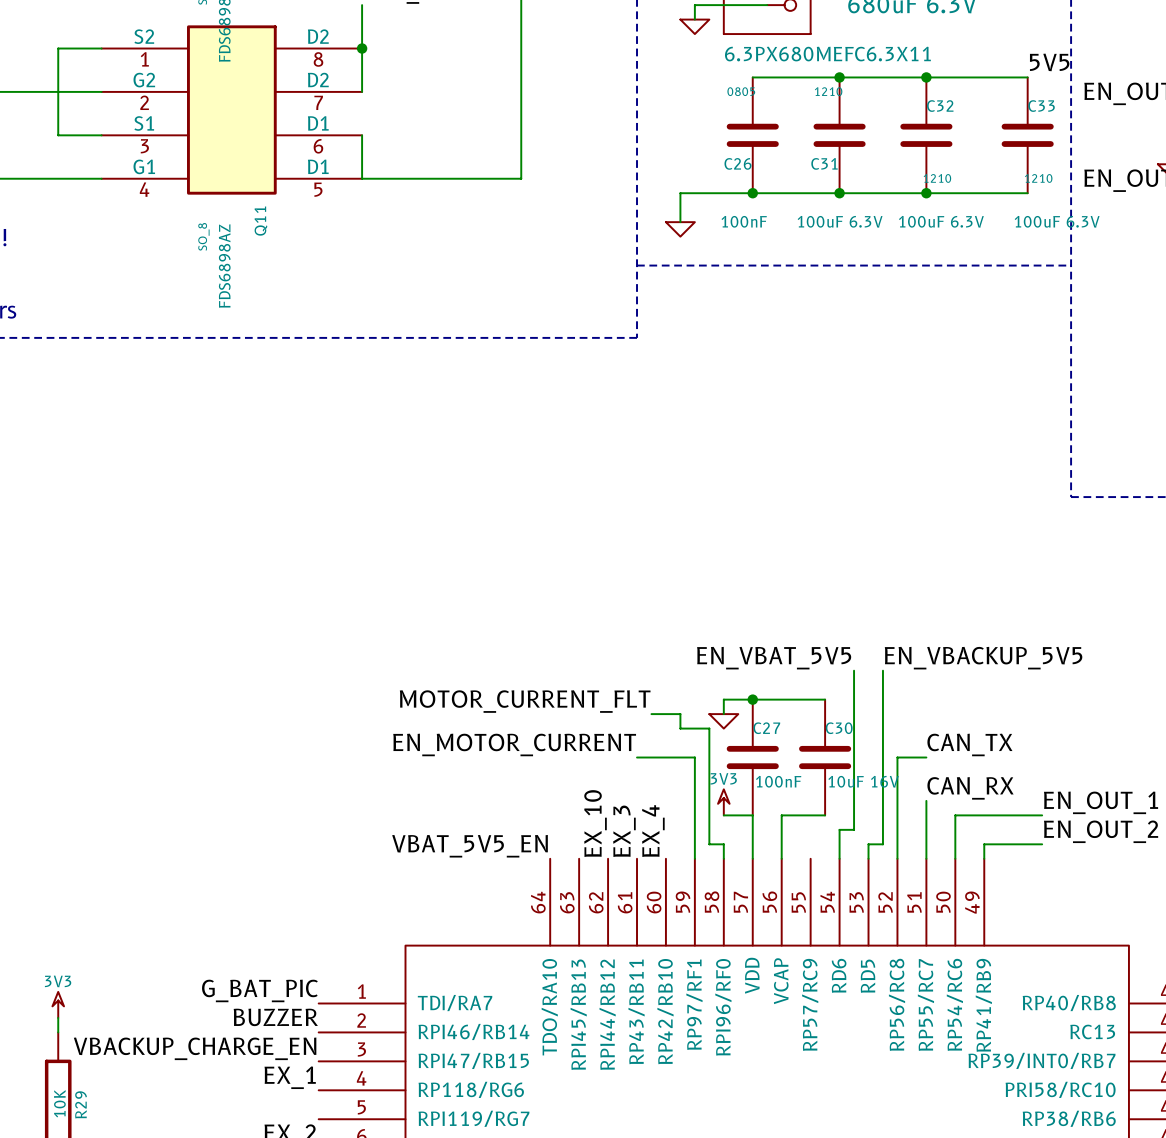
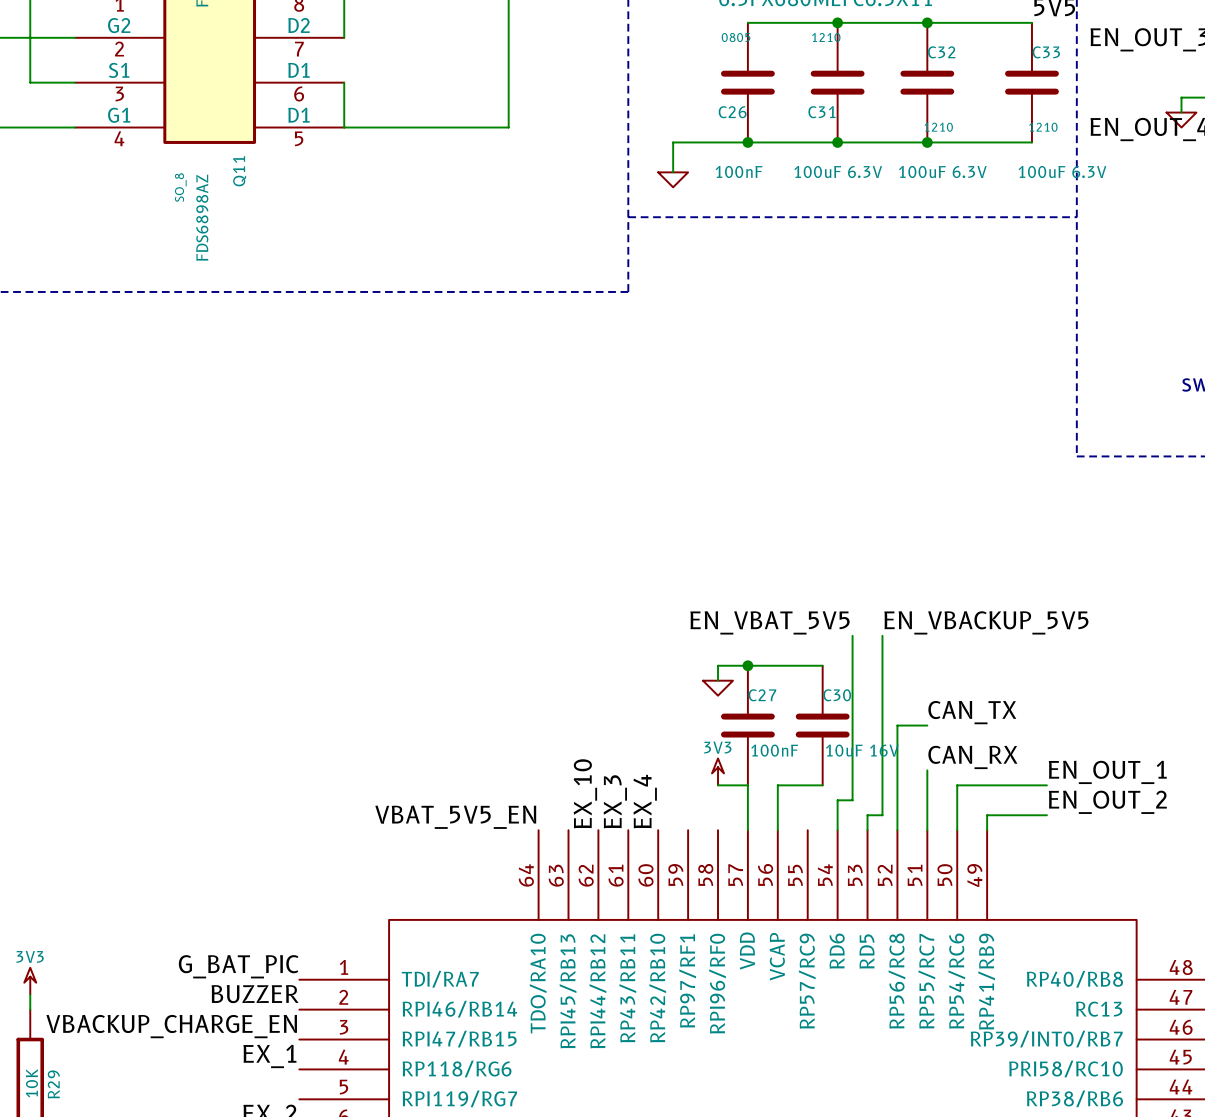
label: MOTOR_CURRENT_FLT (525, 701) -> none
wire: (651, 714) (680, 714) (680, 728) (709, 728) (709, 844) (723, 844) (723, 858) -> none
label: EN_MOTOR_CURRENT (514, 744) -> none
wire: (637, 757) (694, 757) (694, 858) -> none

